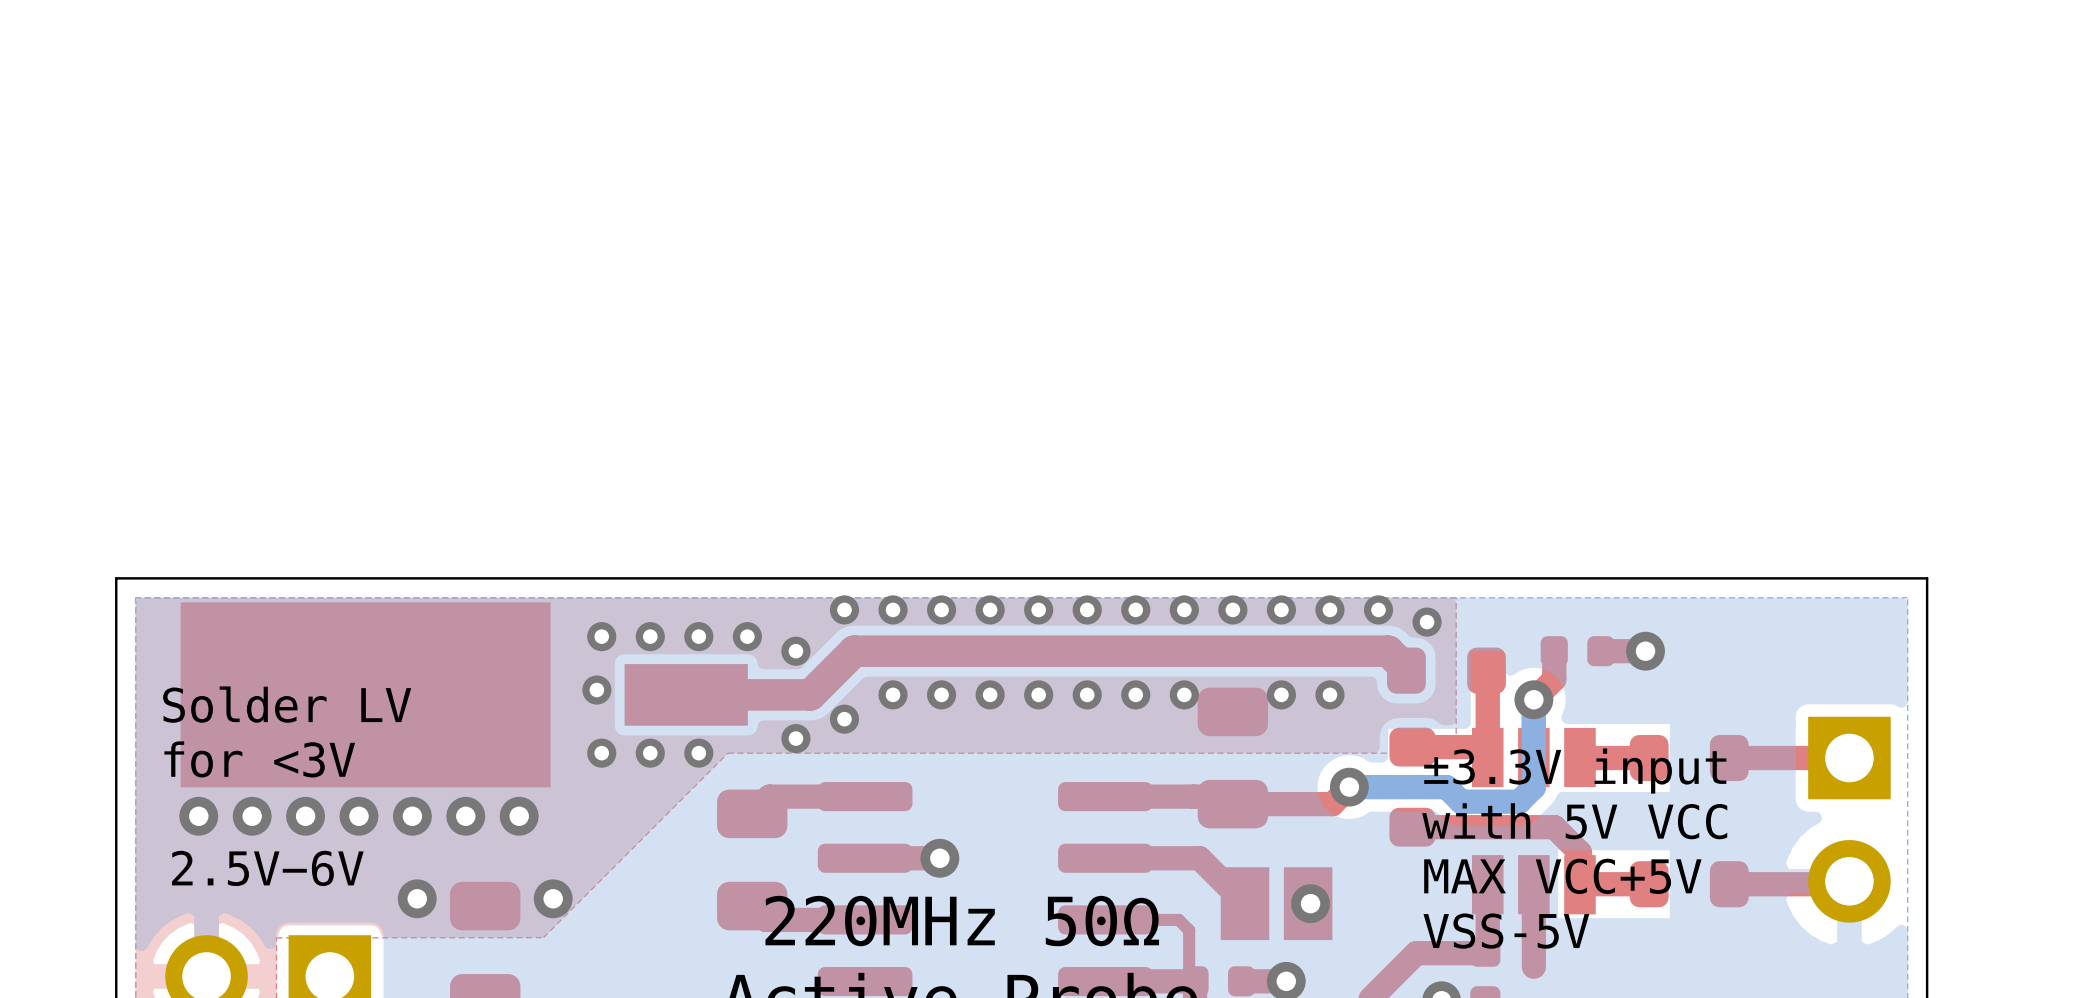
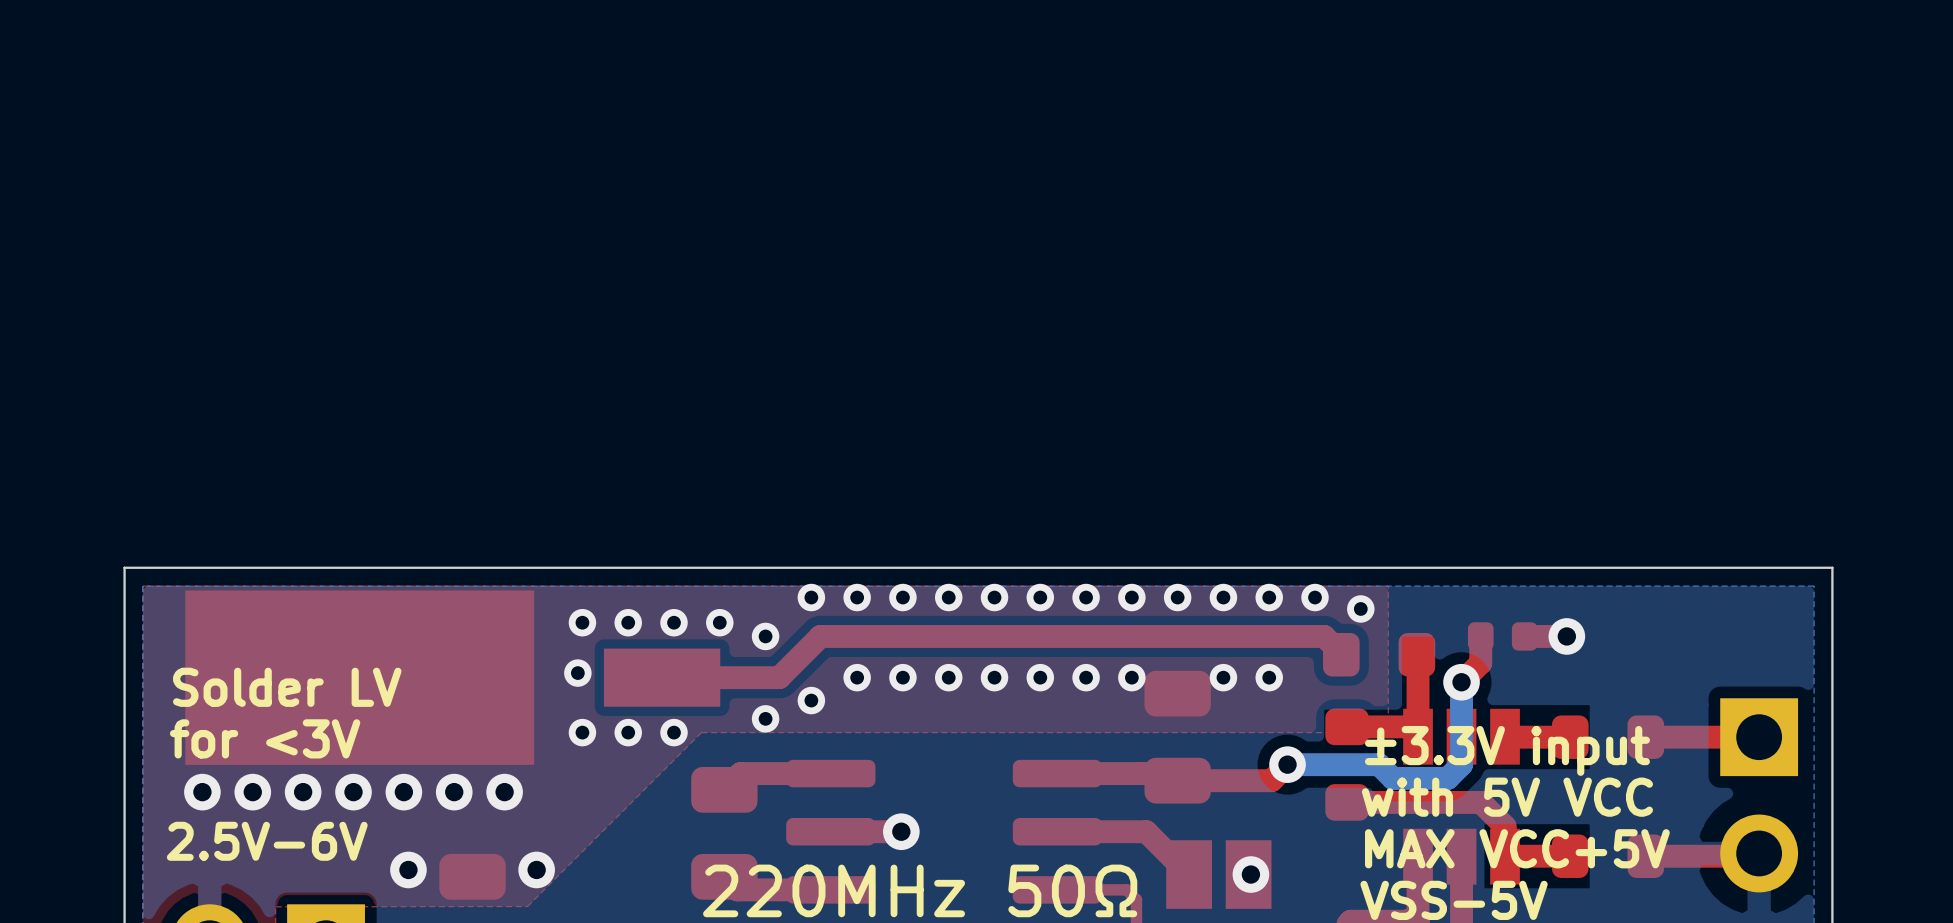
top track width: thick (1406, 670) (1388, 651) (854, 651) (810, 694) (681, 694) -> thin (1341, 654) (1324, 636) (820, 636) (779, 677) (657, 677)

